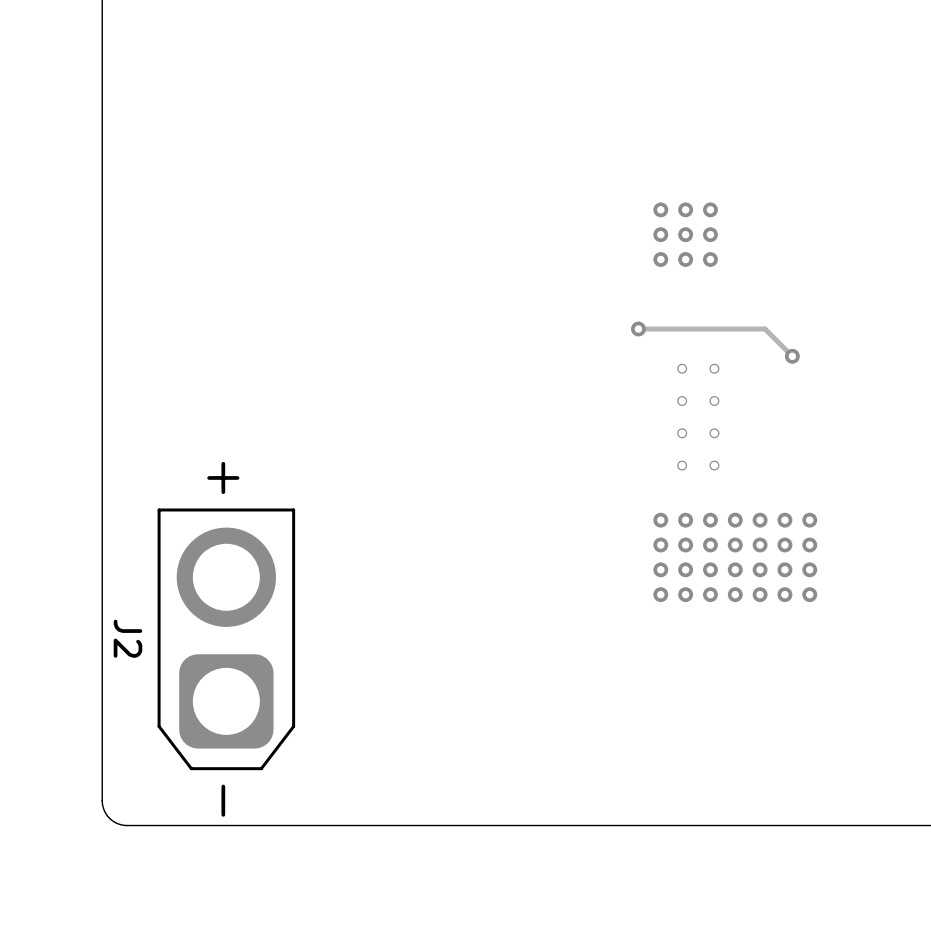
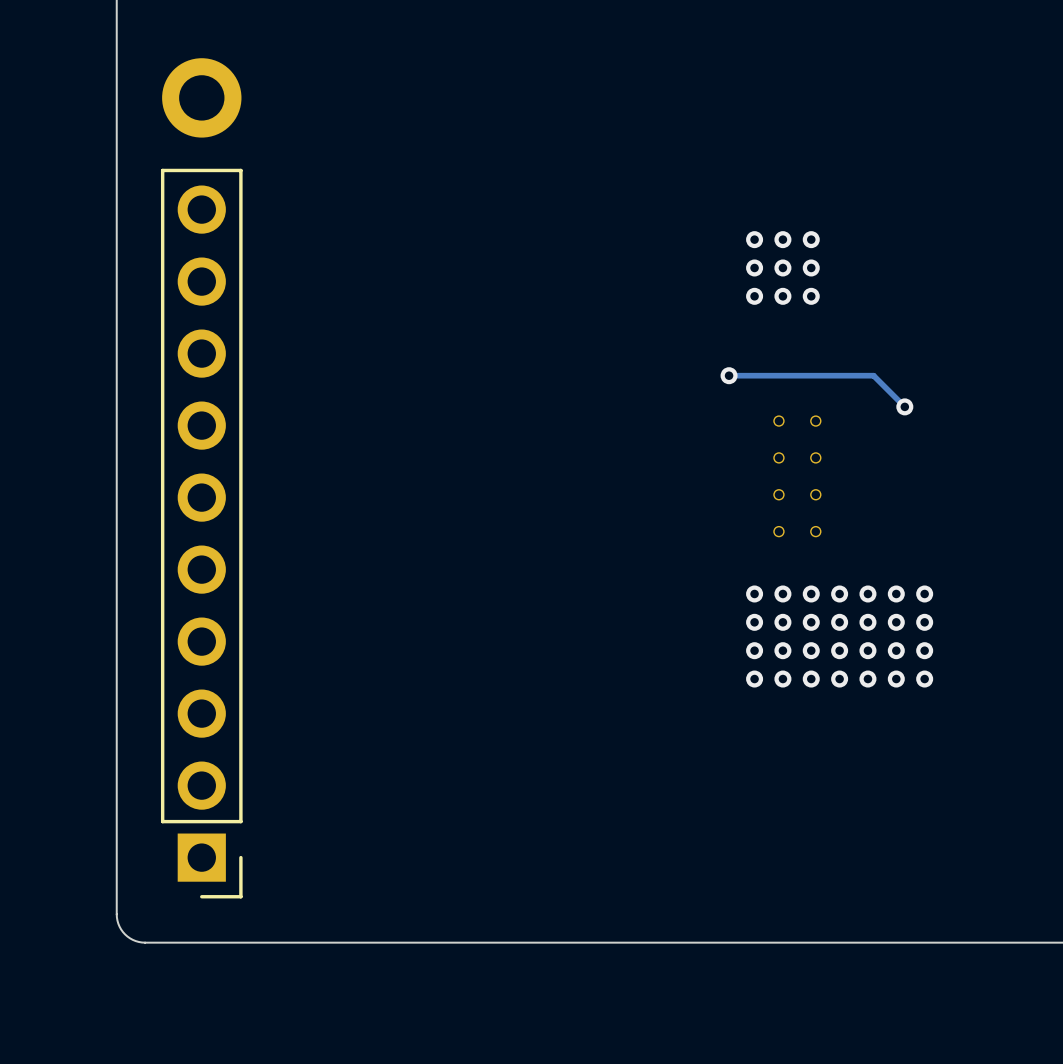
part: none -> (201, 97)
part: none -> (201, 533)
J2: (226, 639) -> none

